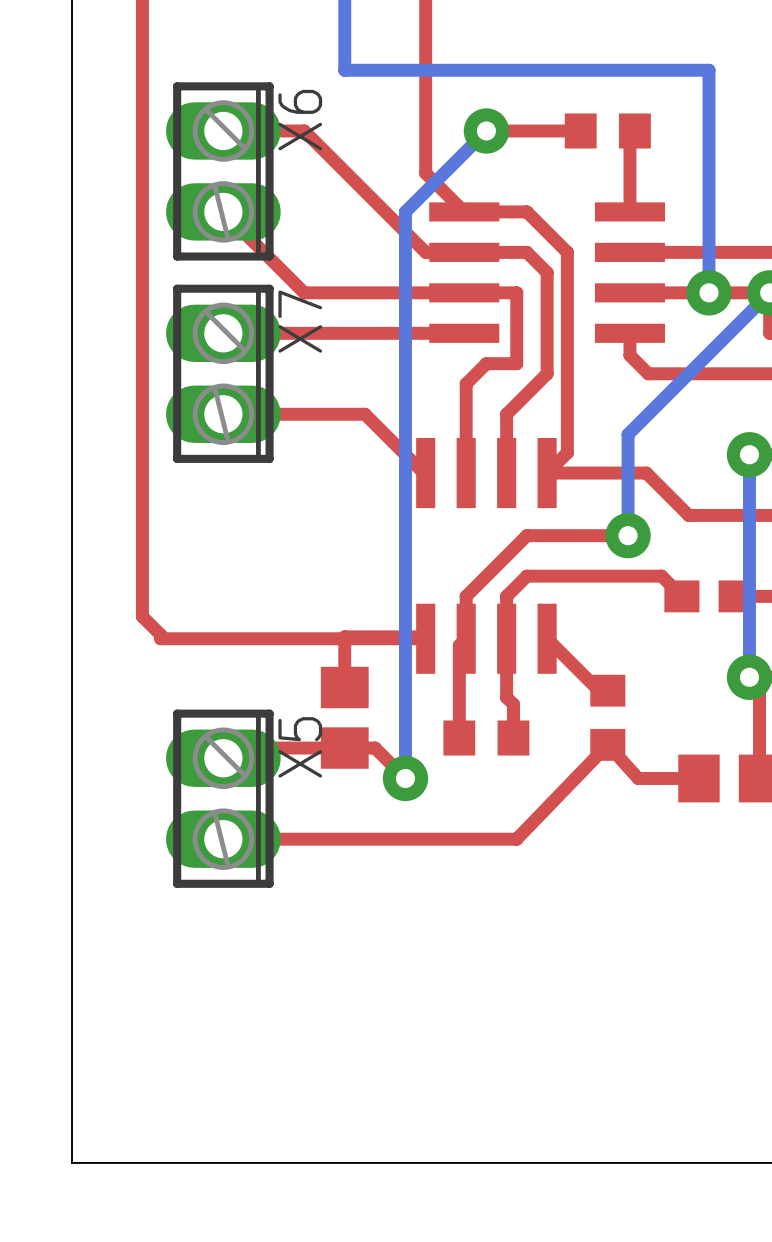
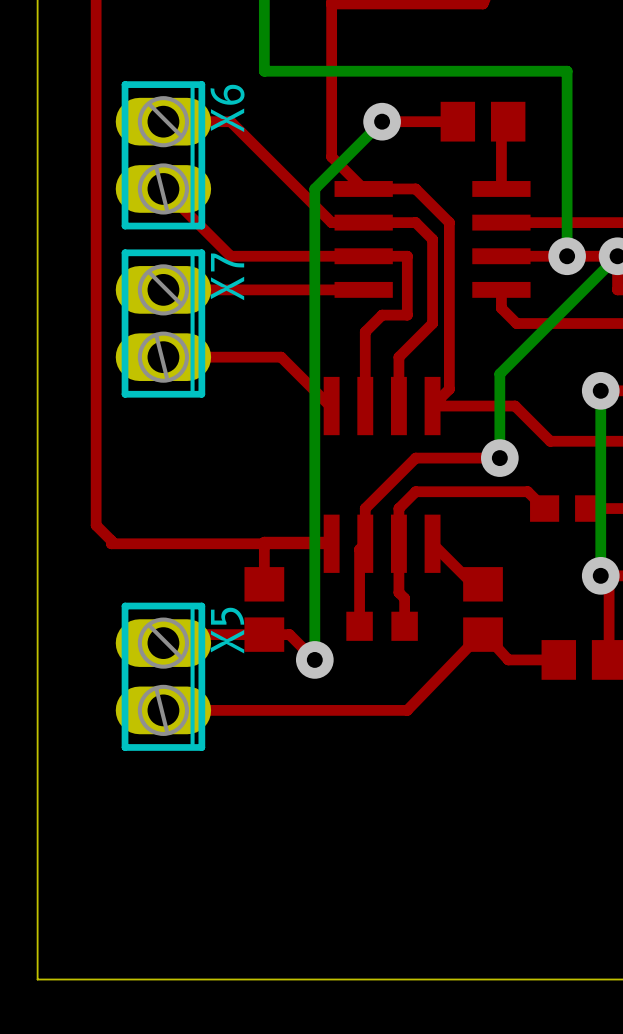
part footprint: [564, 113, 651, 149] -> [440, 101, 526, 142]
part footprint: [590, 674, 626, 761] -> [463, 567, 503, 652]

